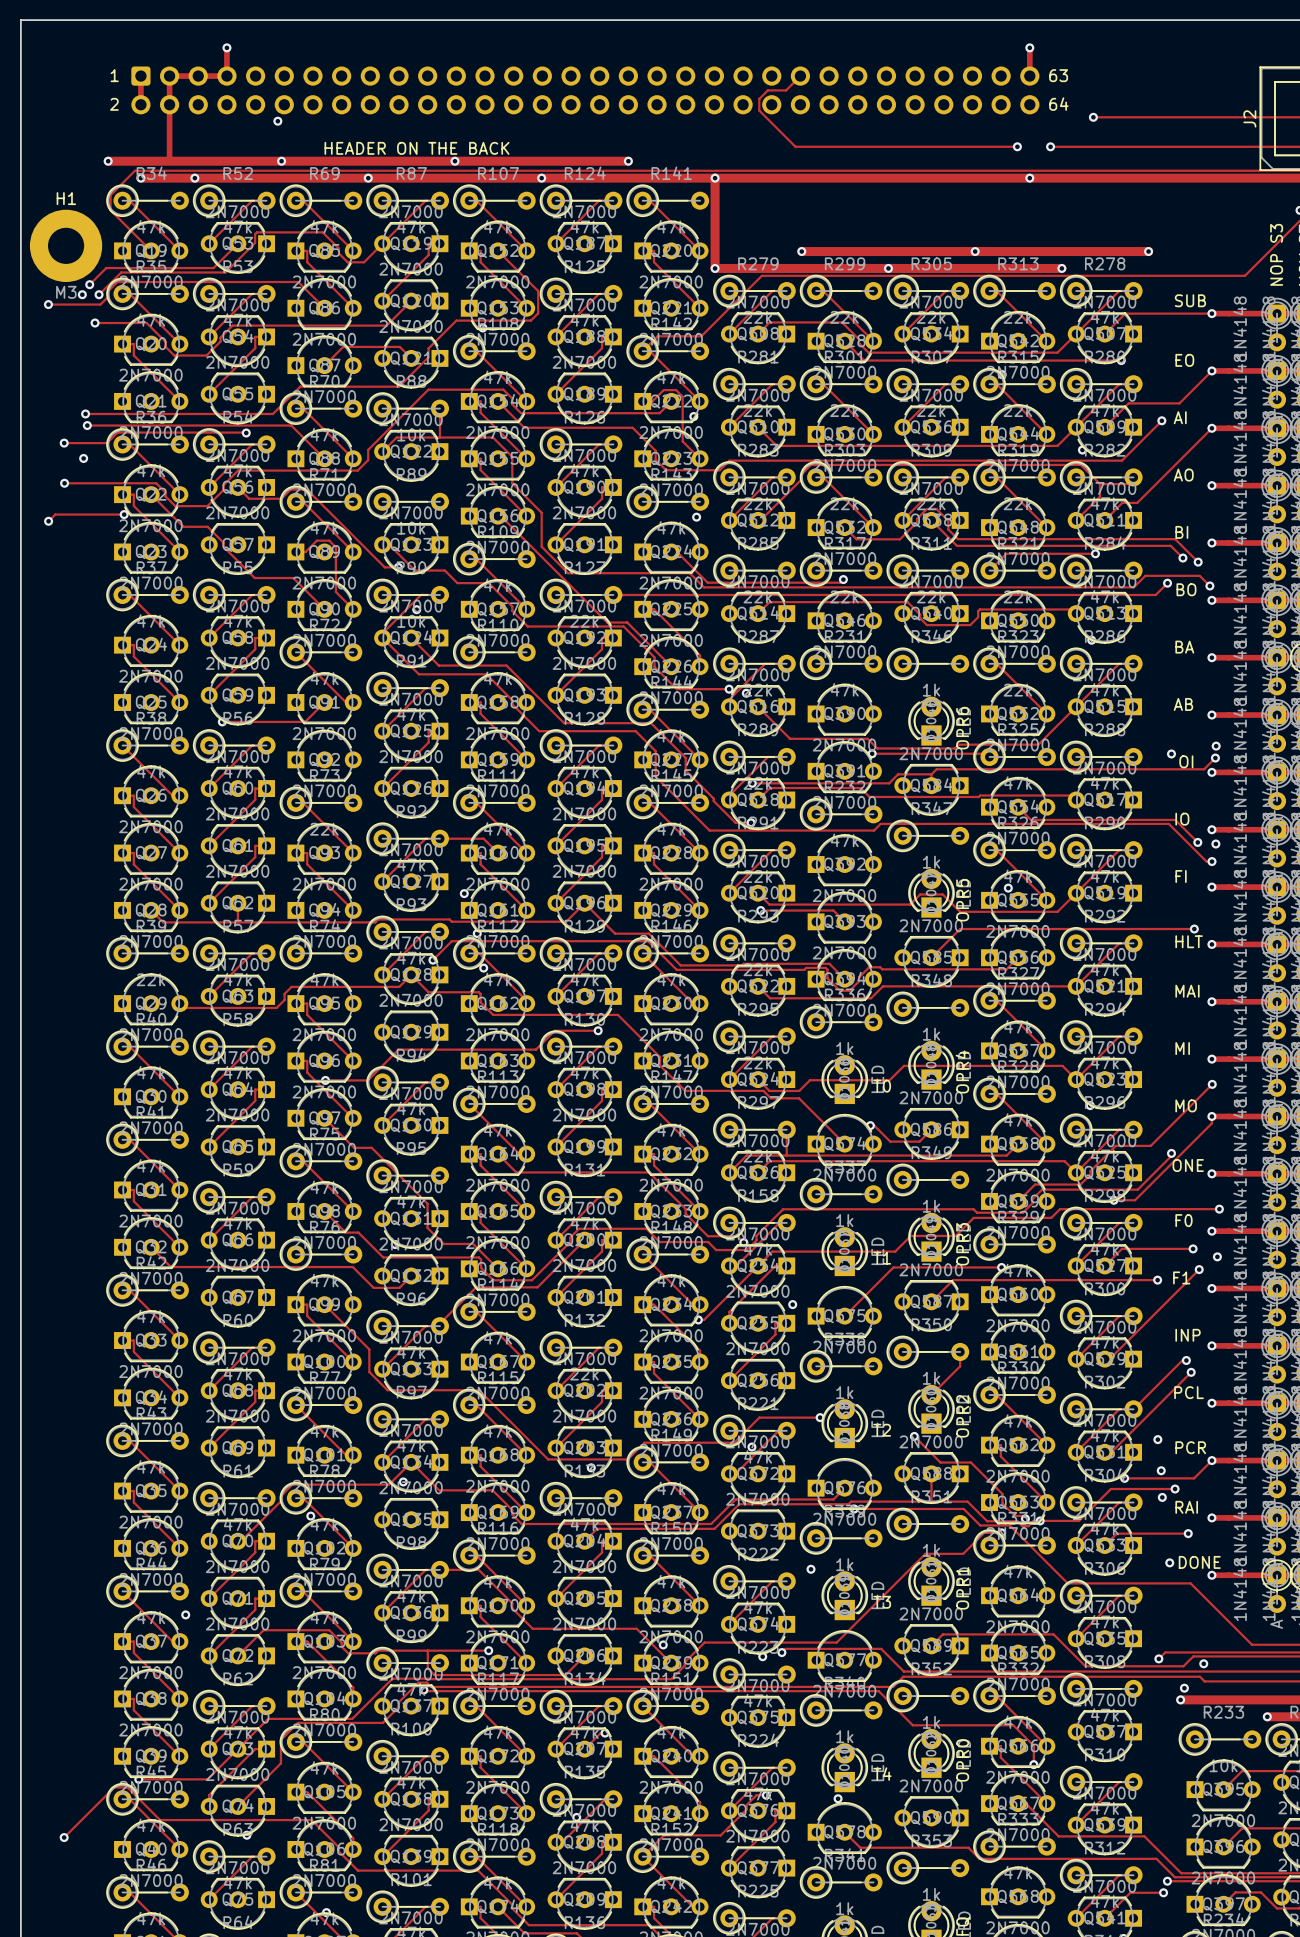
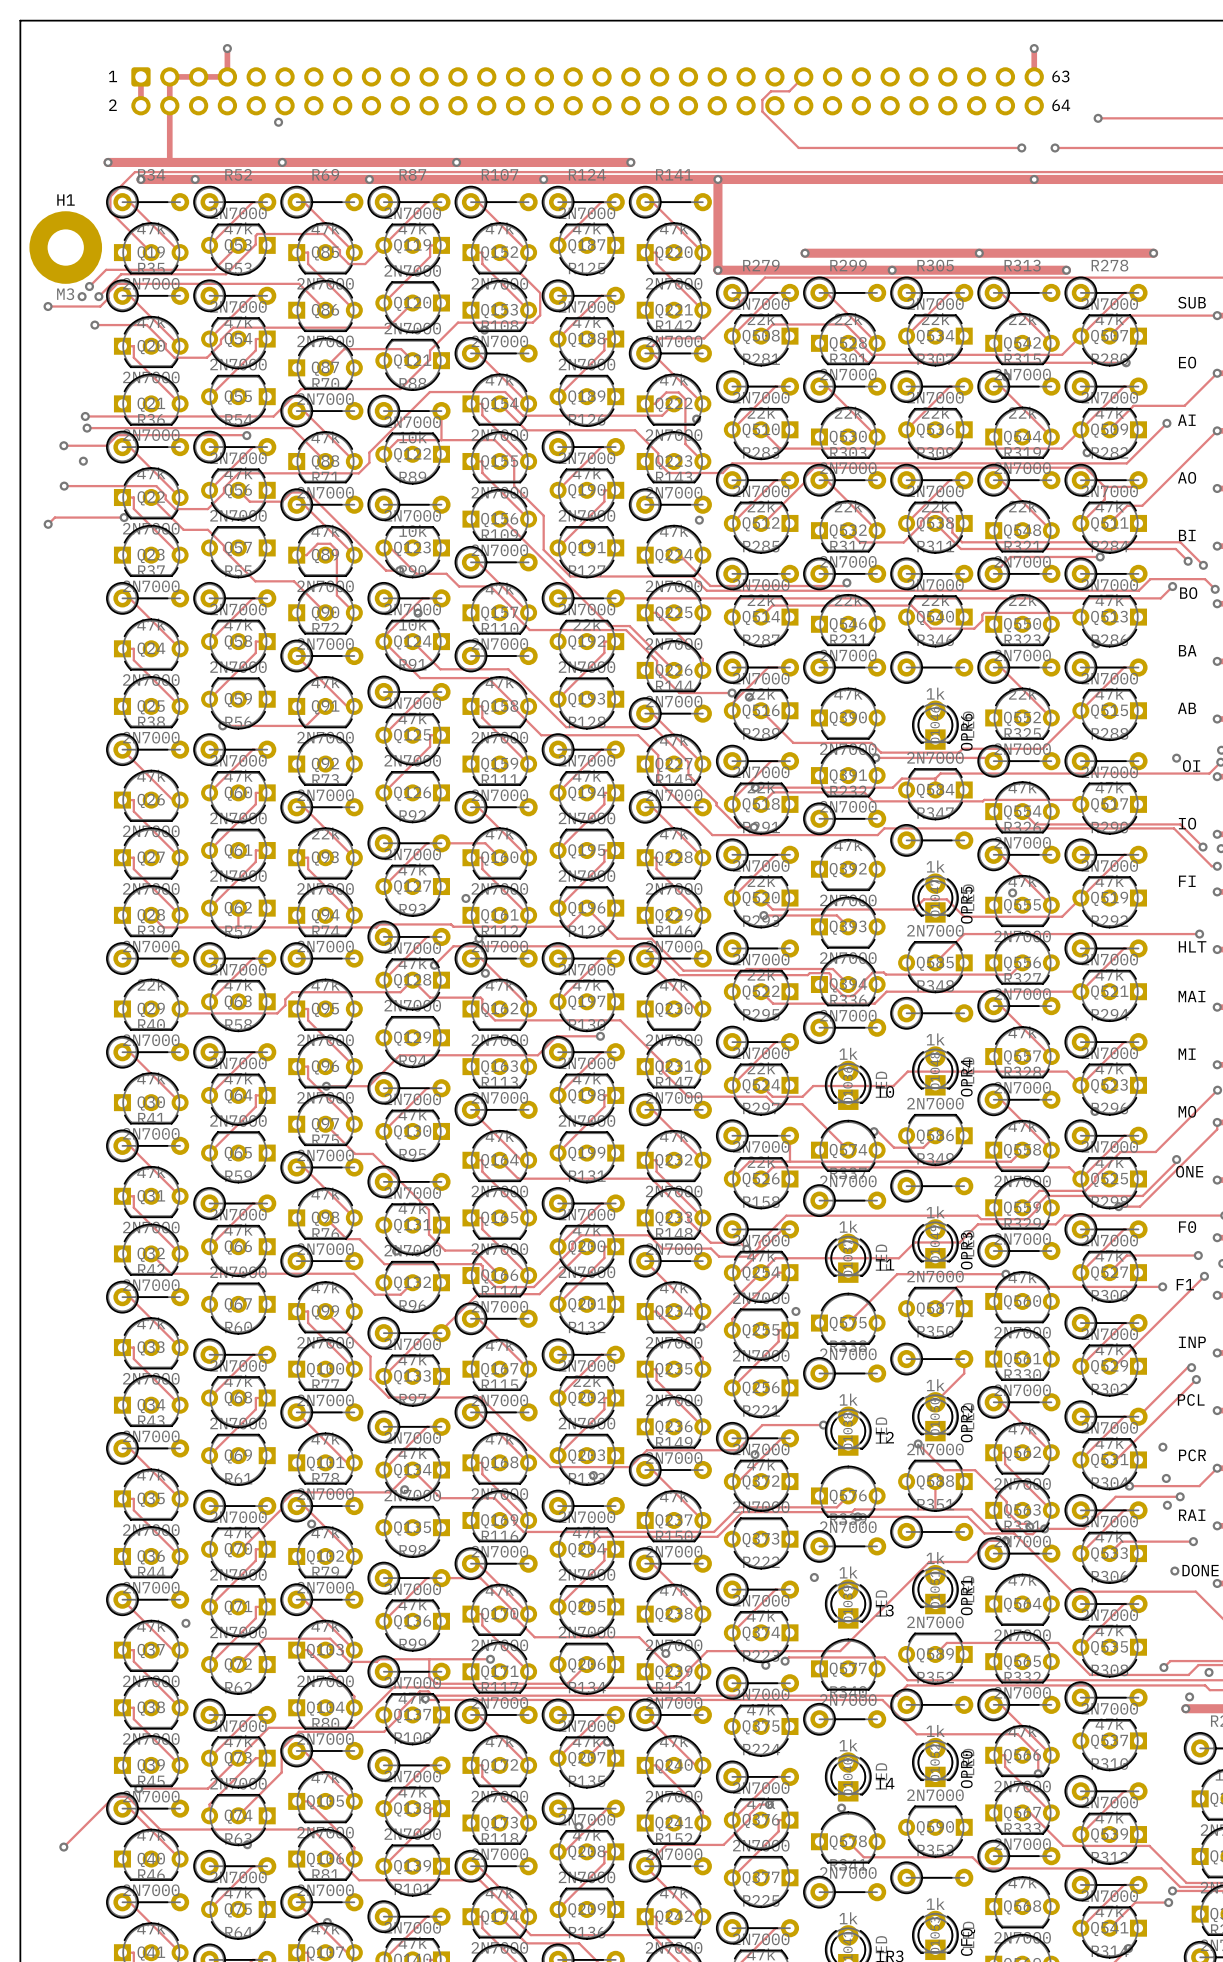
text: HEADER ON THE BACK (417, 148) -> none

